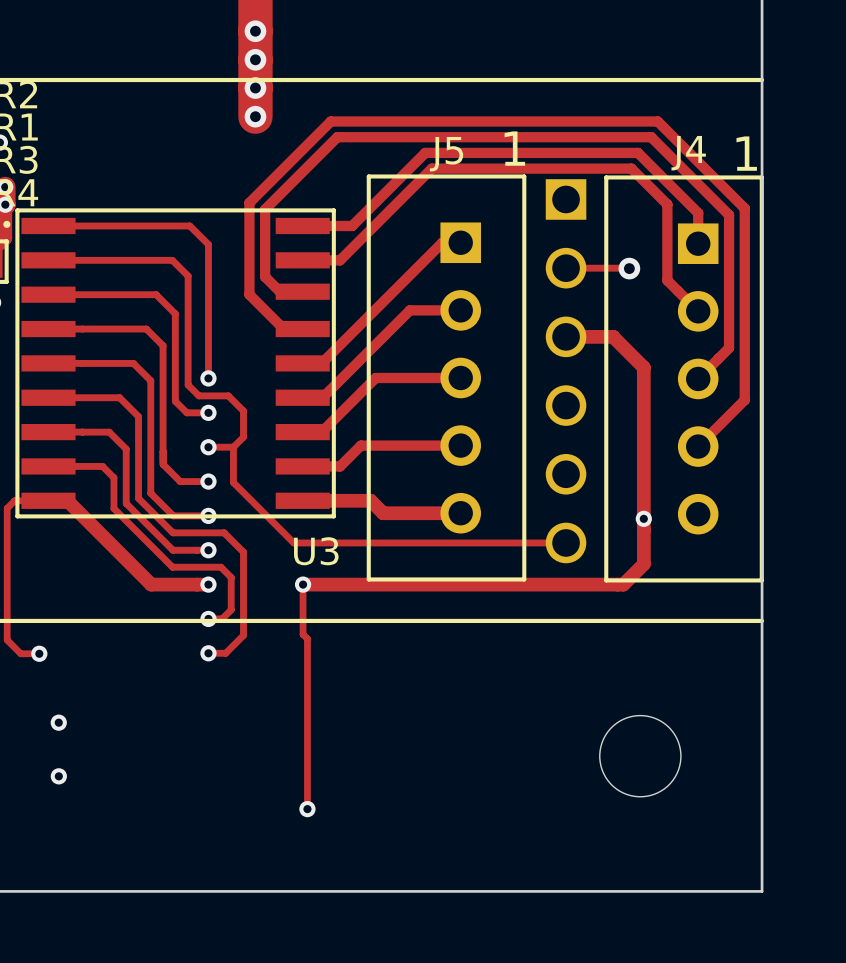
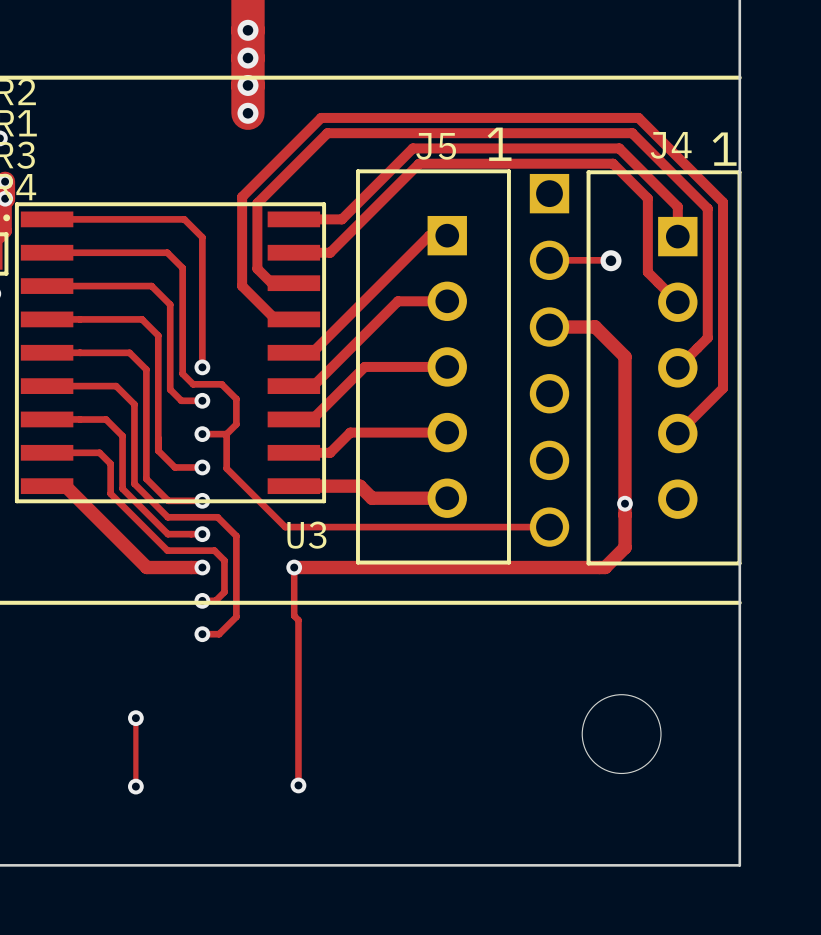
track: (48, 500) (14, 500) (7, 508) (7, 640) (20, 653) (39, 653) -> none
via: (39, 653) -> none
via: (58, 722) -> none
track: none -> (135, 718) (135, 786)
via: none -> (135, 718)
via: (58, 776) -> none
via: none -> (135, 786)

